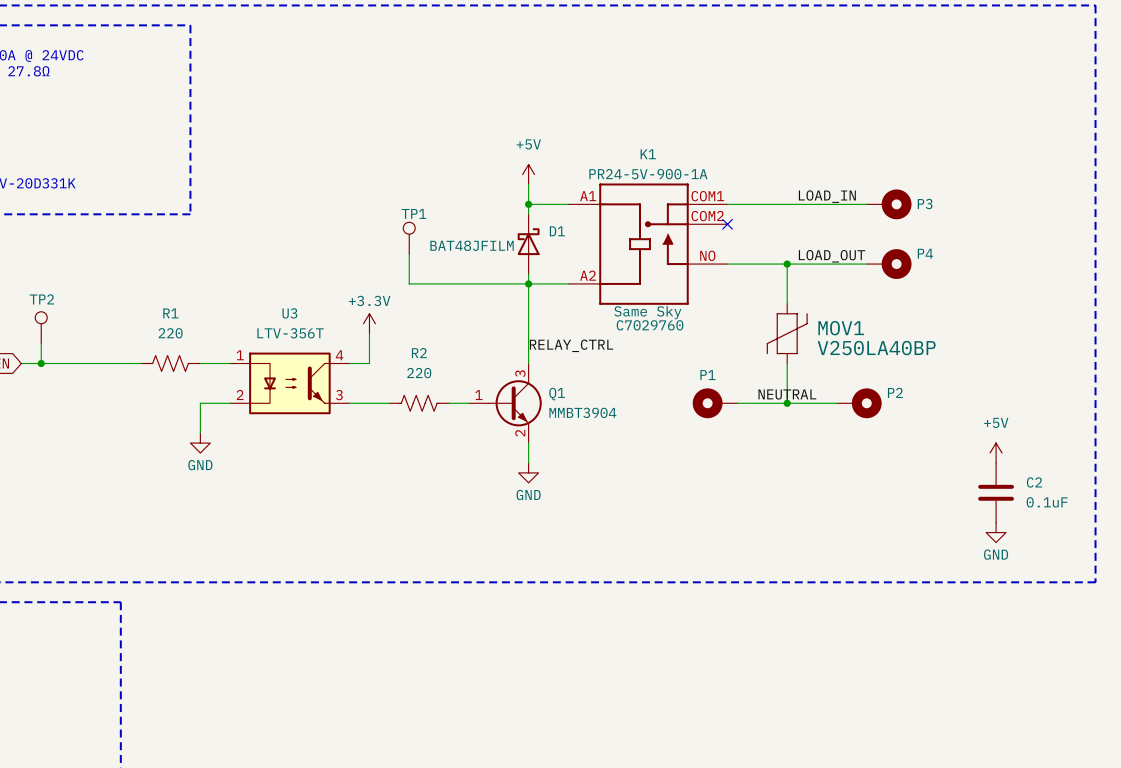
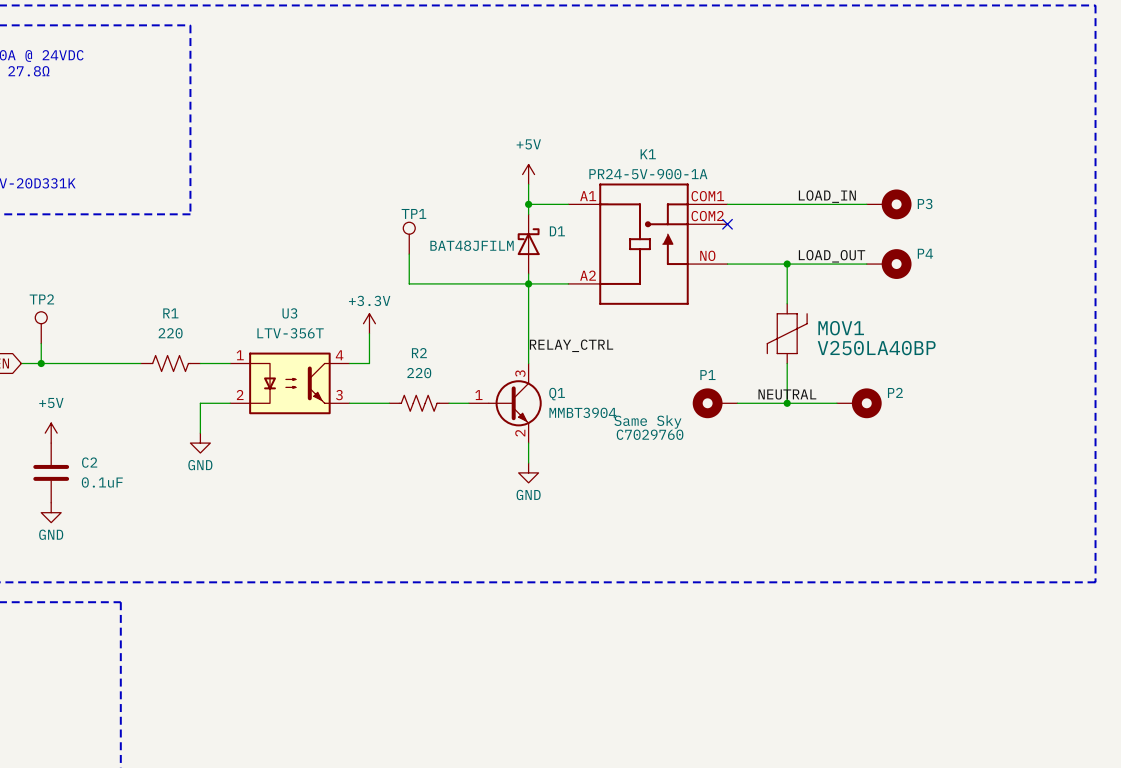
K1 text position: Same Sky (647, 312) -> Same Sky (647, 421)
K1 text position: C7029760 (650, 325) -> C7029760 (650, 434)
power symbol: none -> +5V (51, 433)
power symbol: +5V (996, 453) -> none
C2 position: (996, 492) -> (51, 472)
power symbol: none -> GND (51, 512)
power symbol: GND (996, 532) -> none

